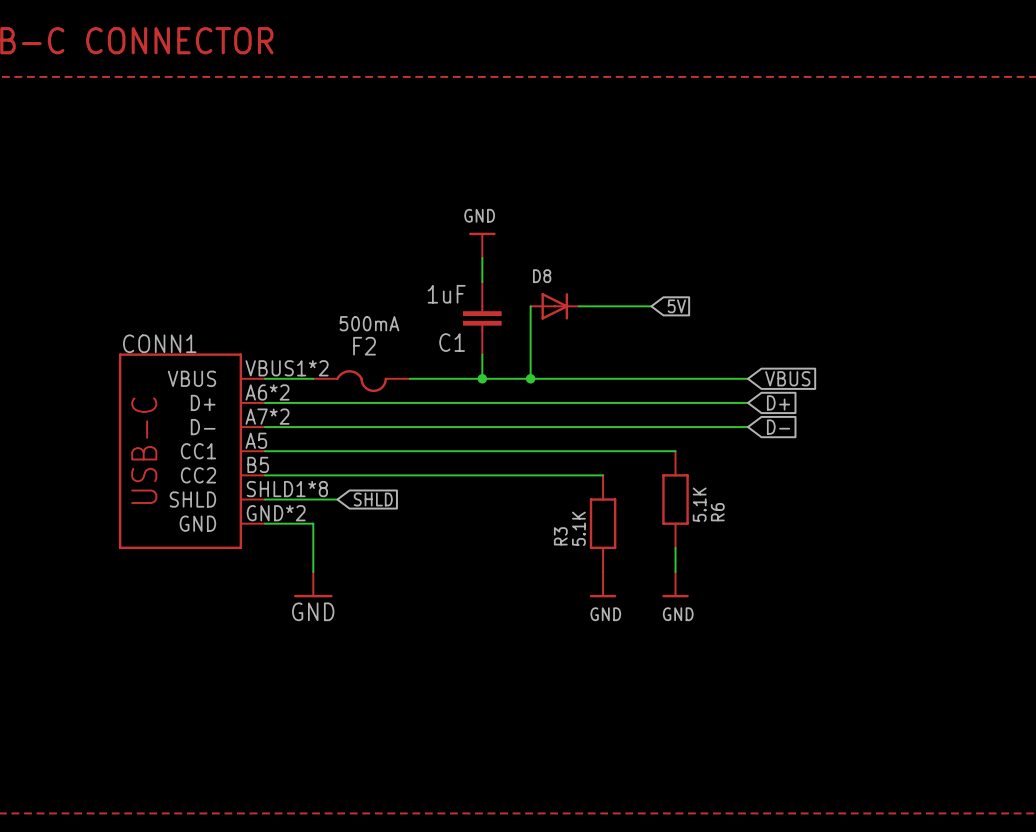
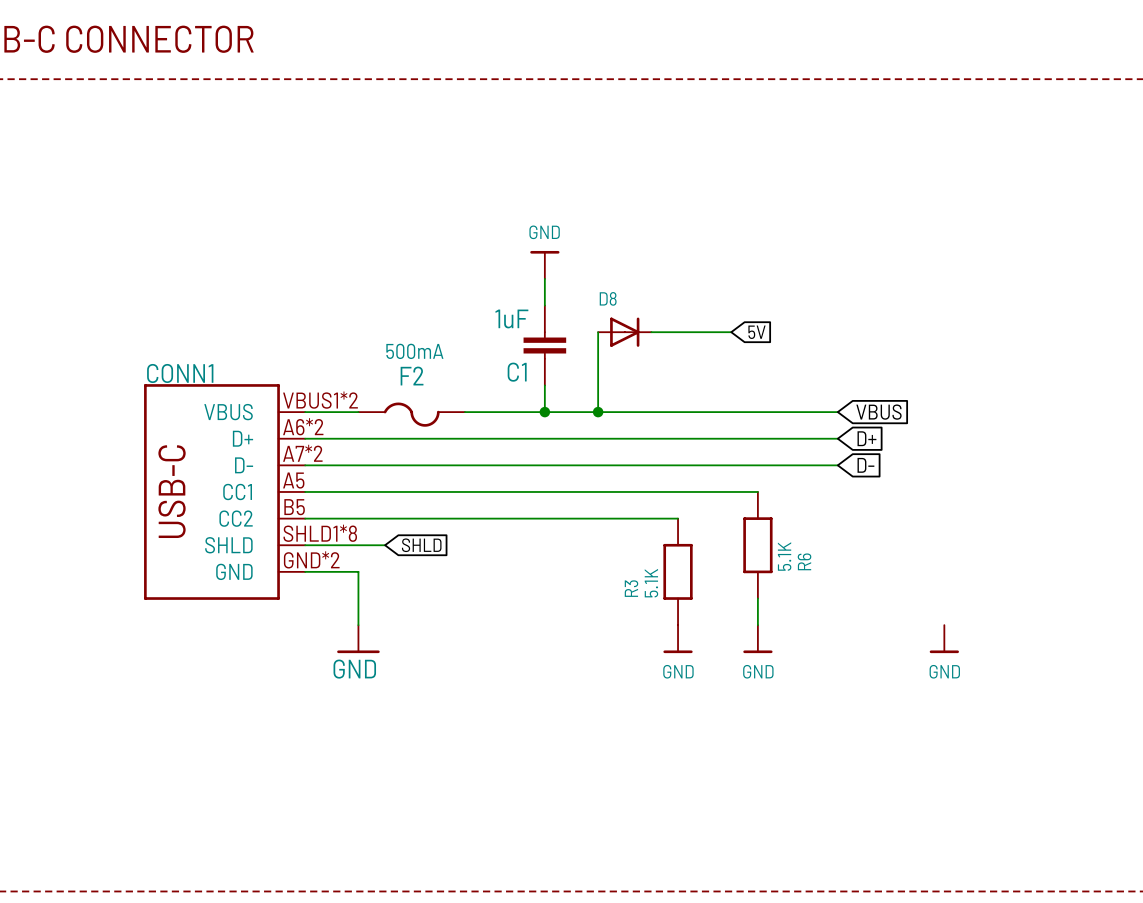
power symbol: none -> GND (944, 639)

